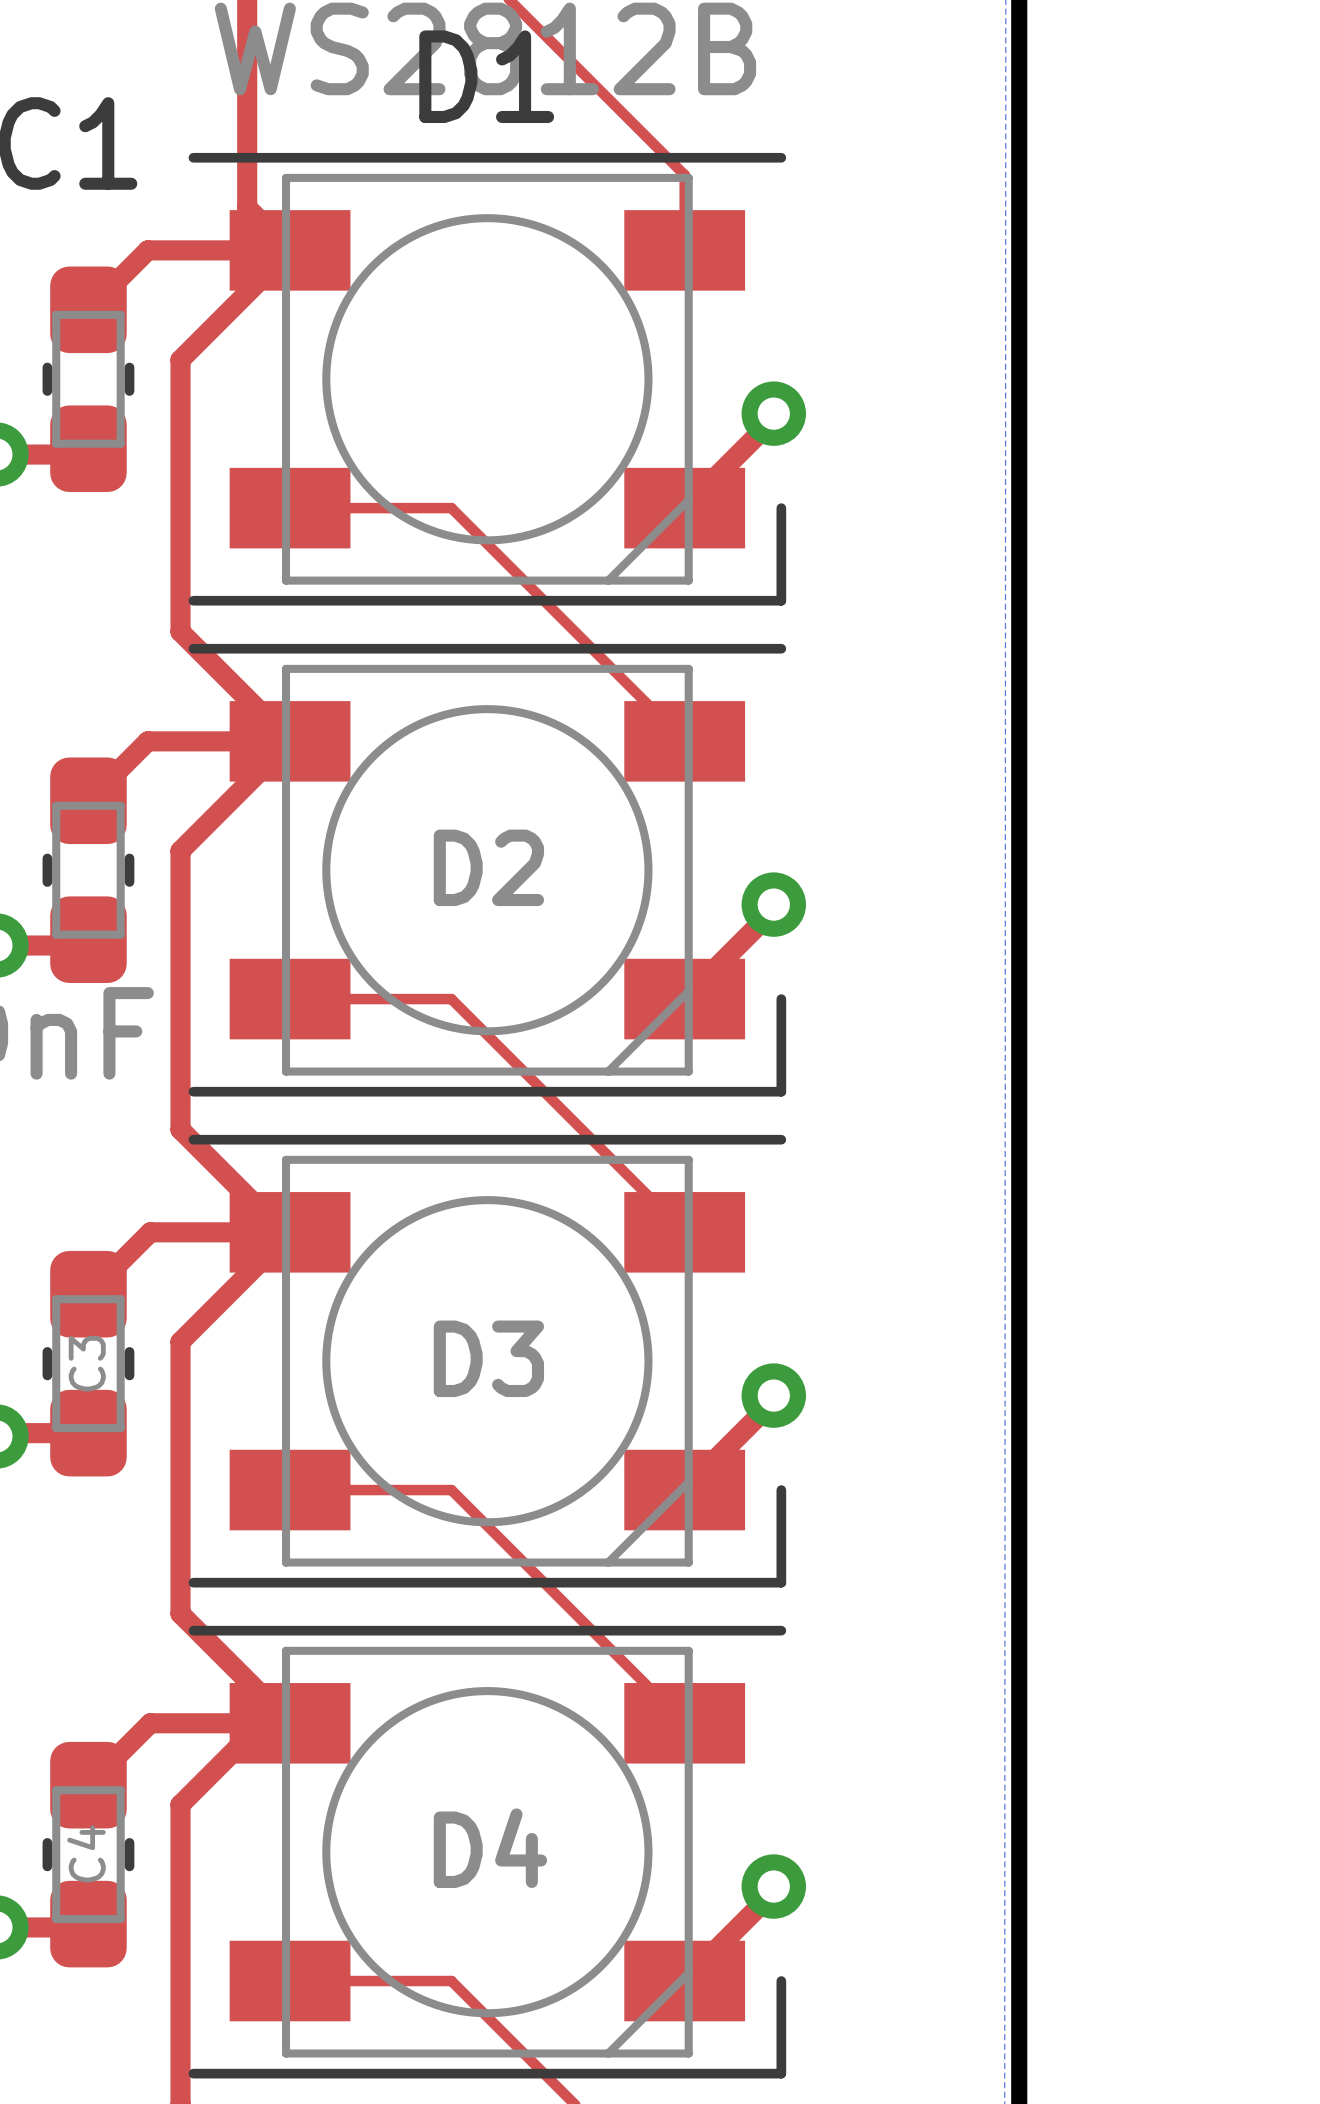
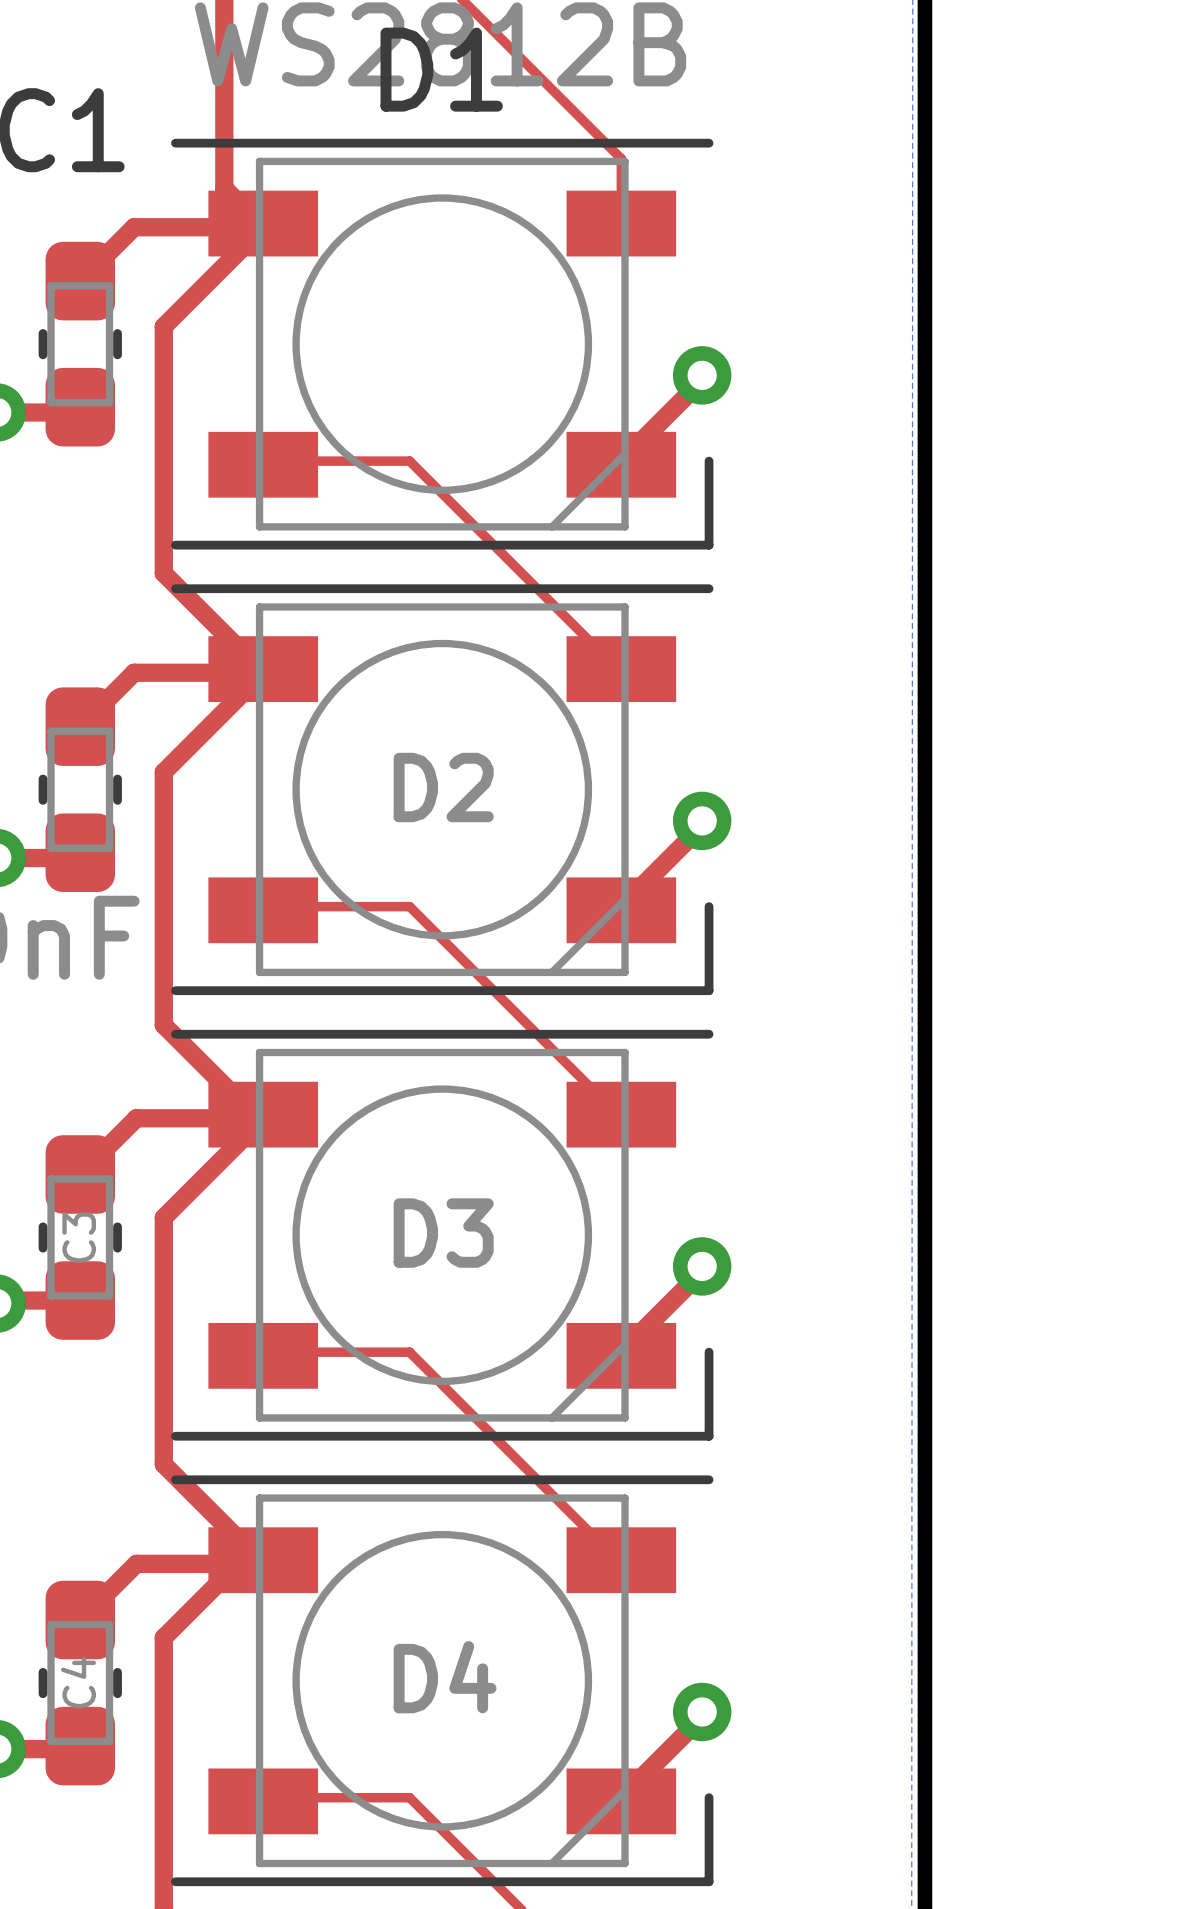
D1 footprint: [188, 152, 787, 606] -> [171, 138, 714, 550]
D2 footprint: [188, 643, 787, 1097] -> [171, 584, 714, 996]
D3 footprint: [188, 1134, 787, 1588] -> [171, 1029, 714, 1441]
D4 footprint: [188, 1625, 787, 2079] -> [171, 1475, 714, 1887]

